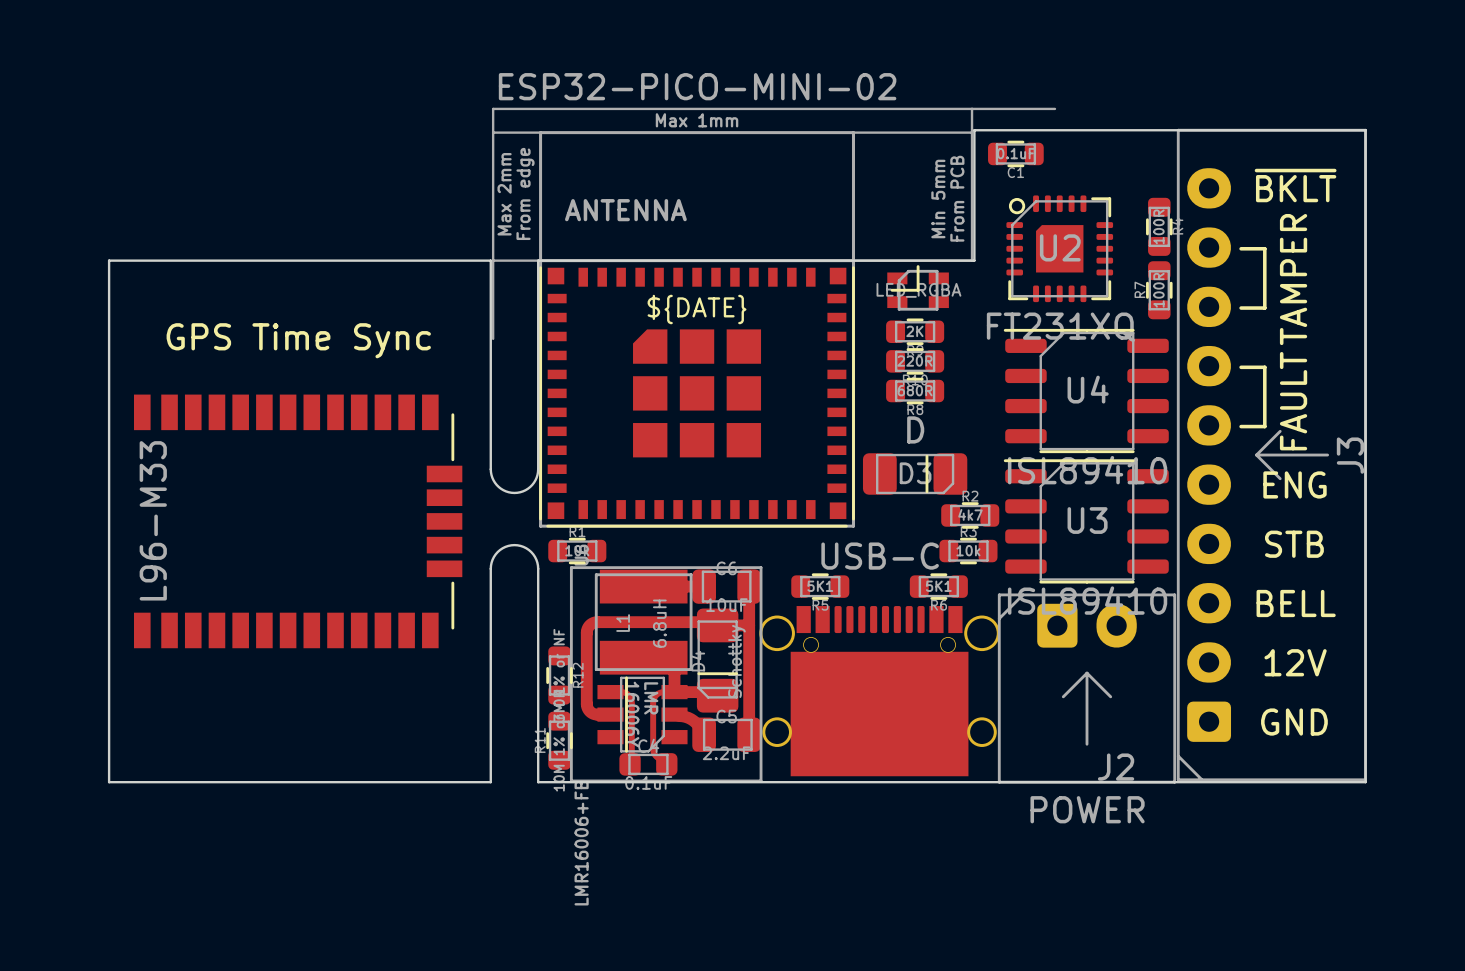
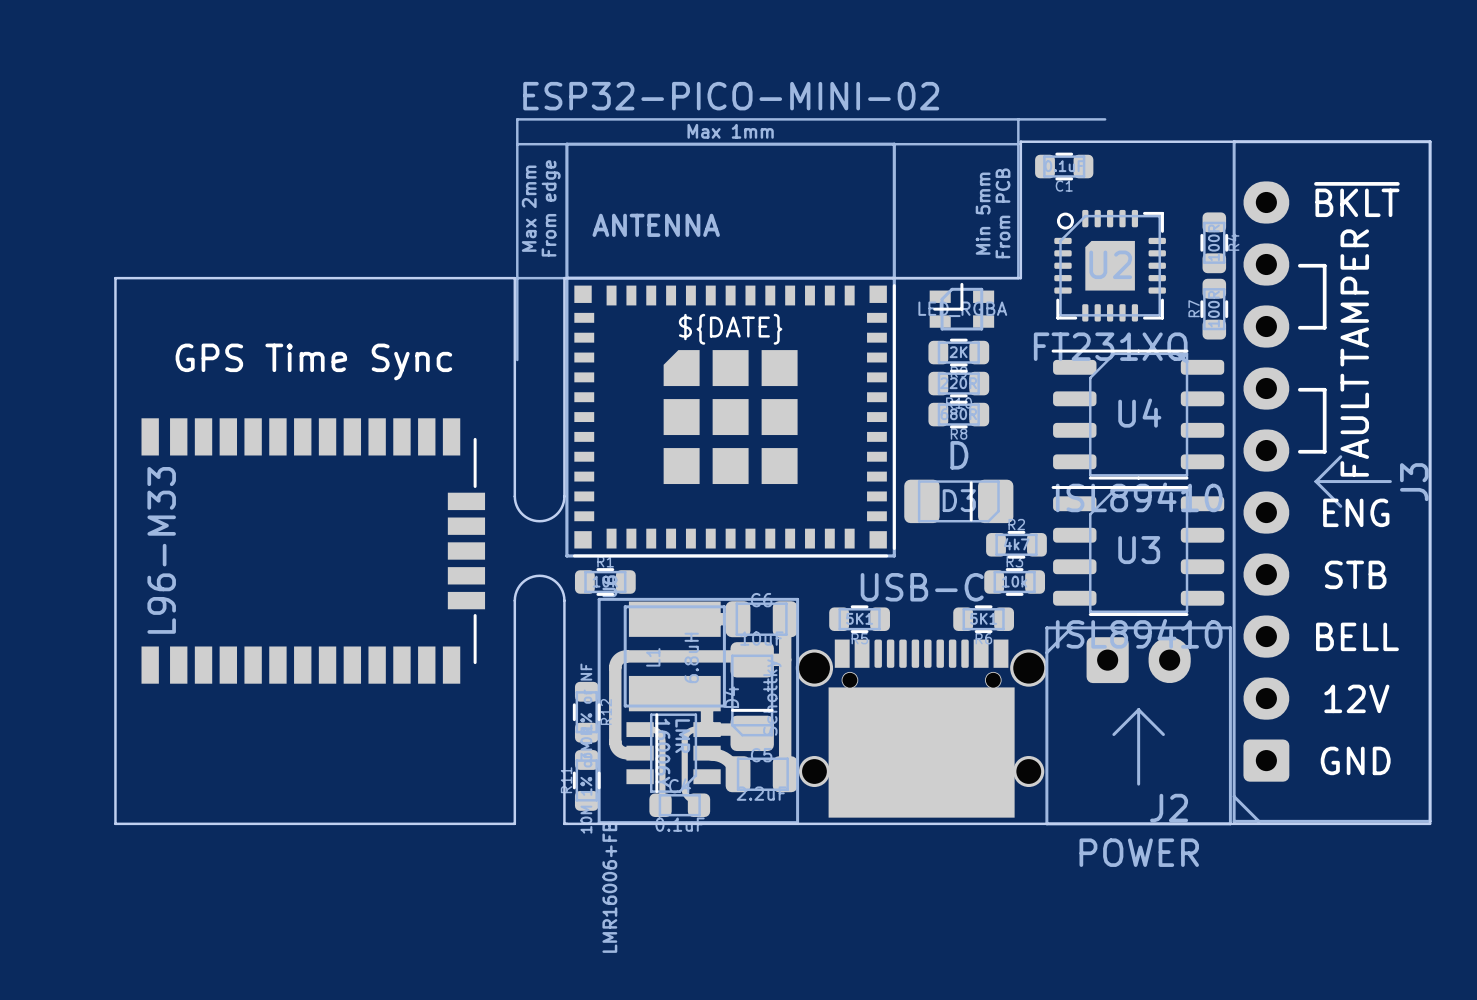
part footprint: [491, 107, 1057, 528] -> [516, 118, 1107, 558]

